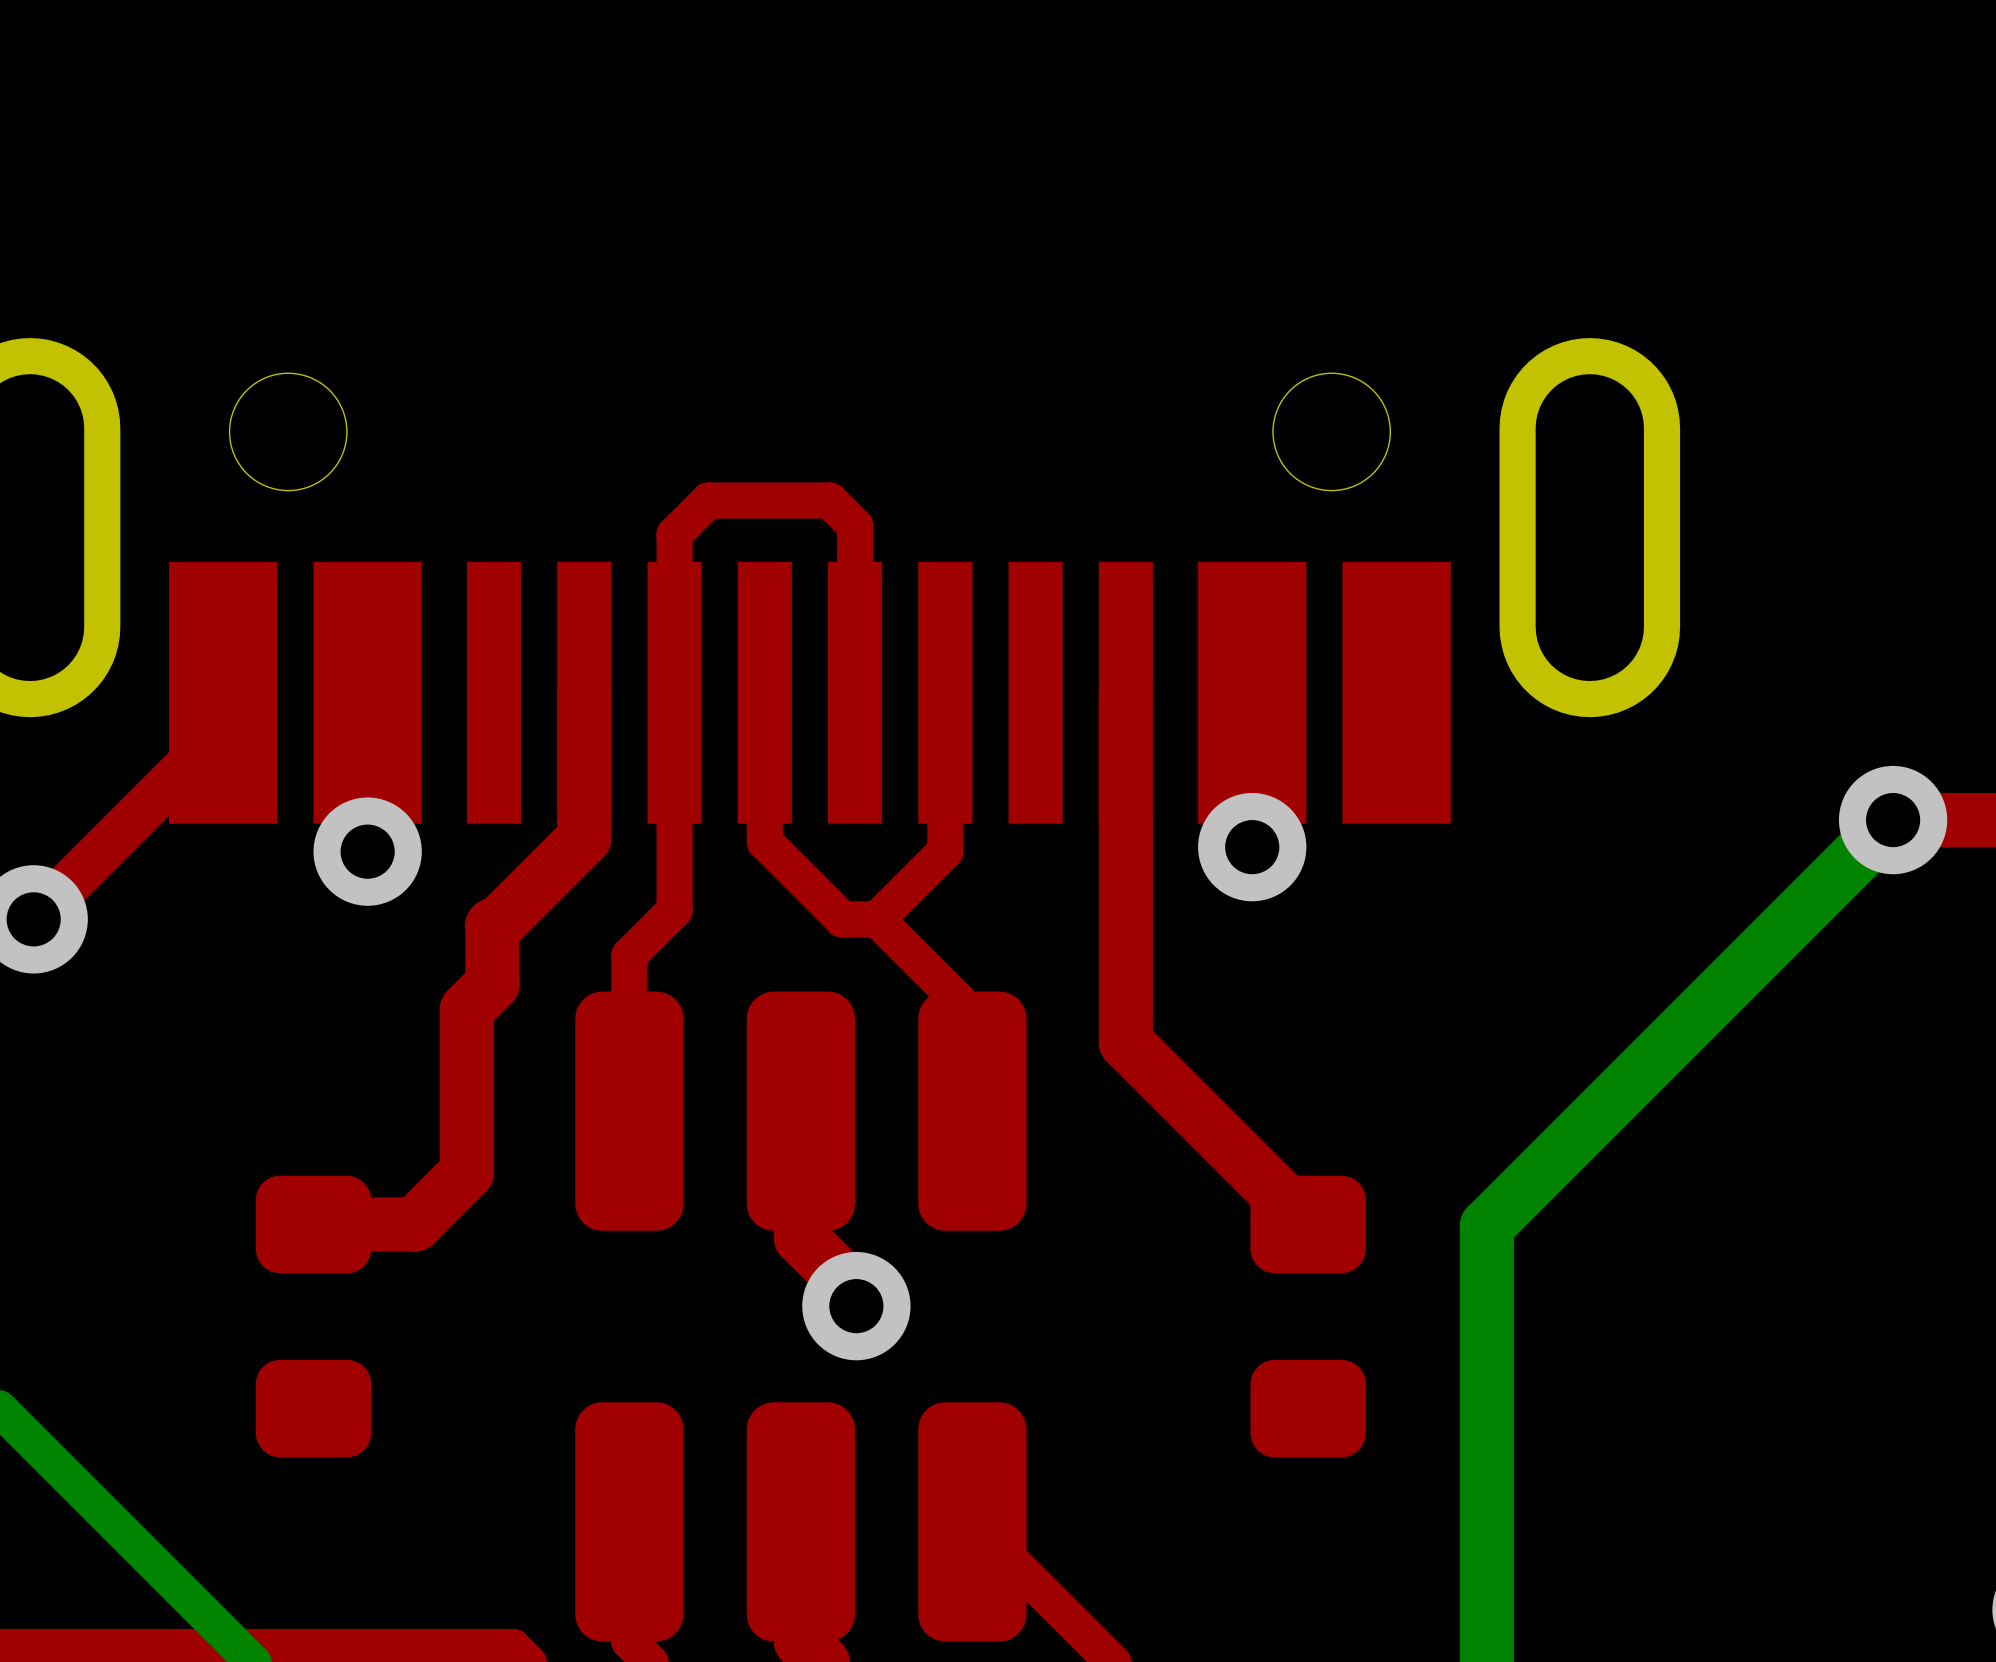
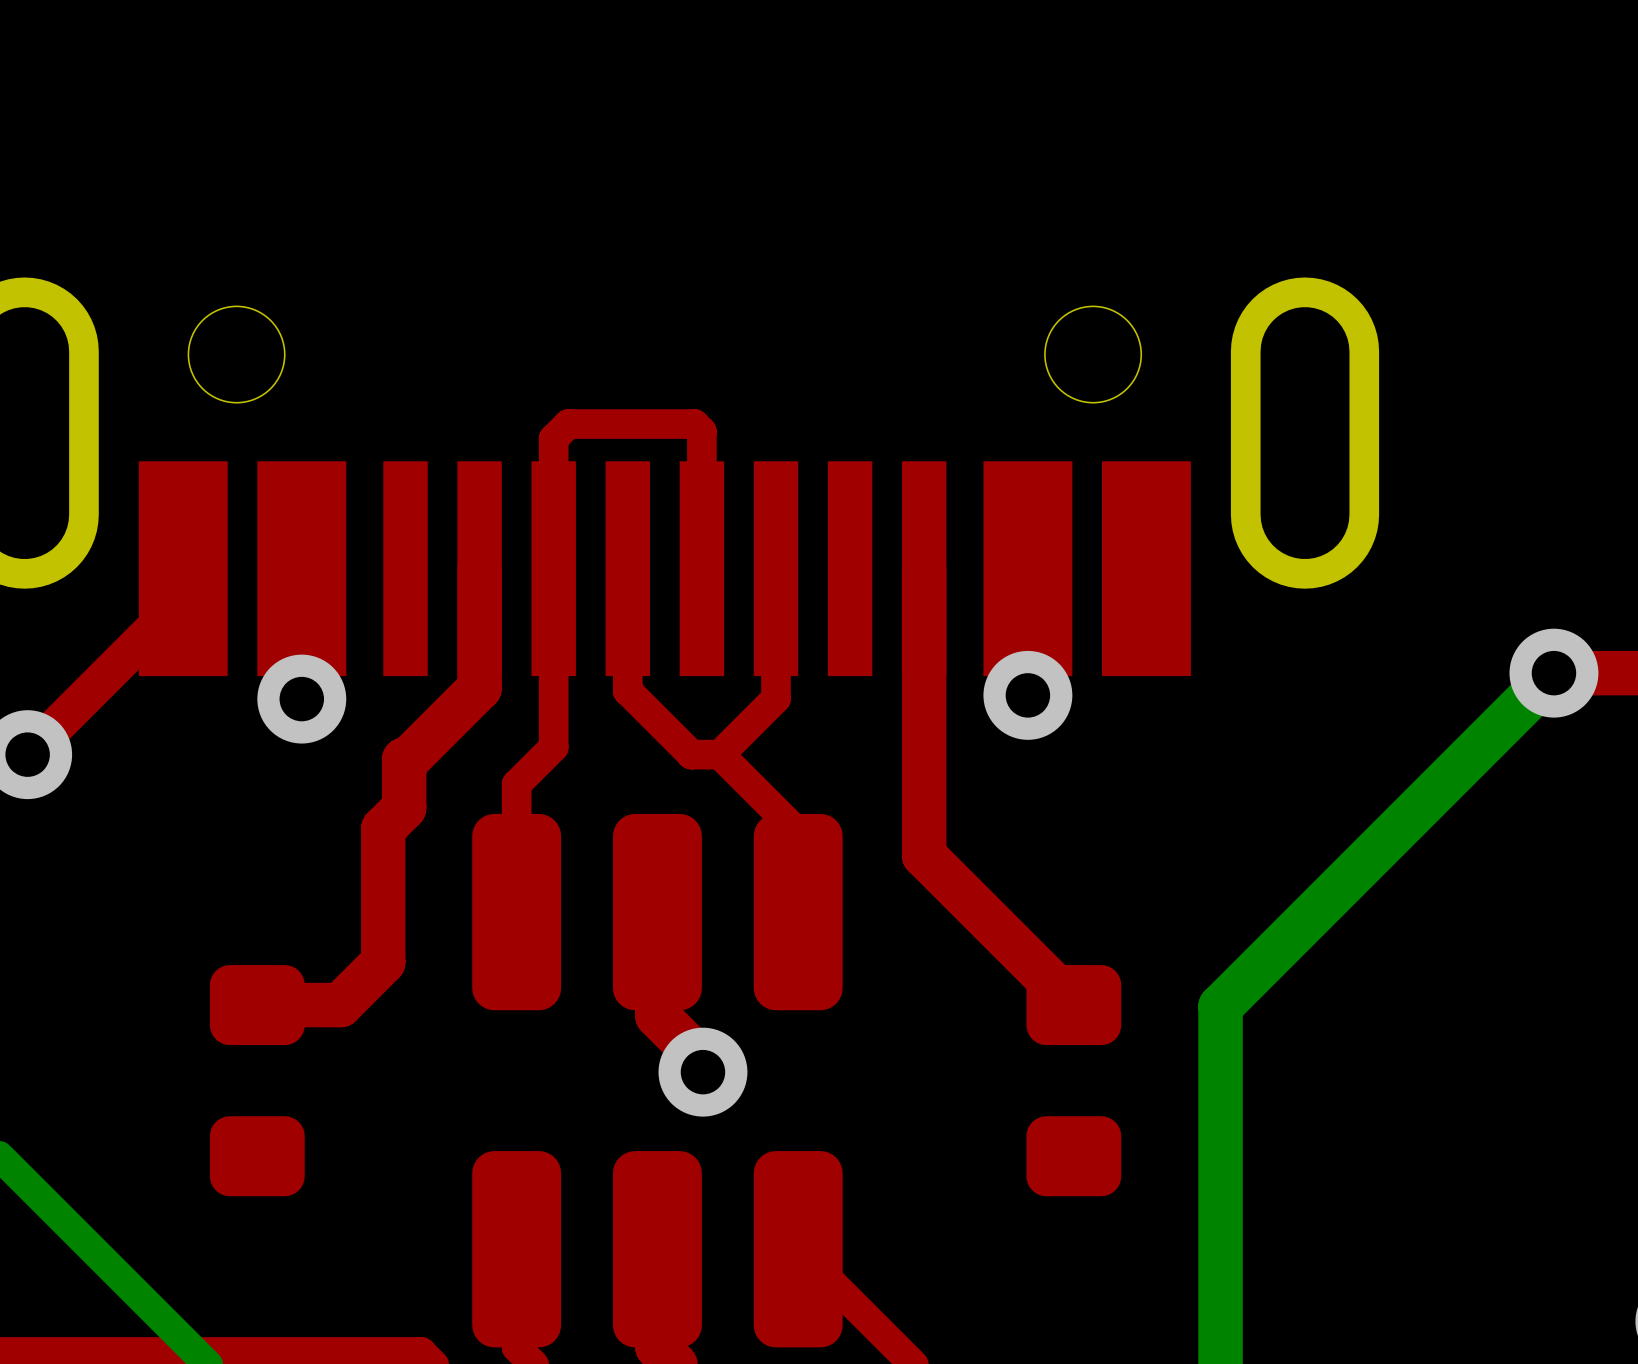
top track: (845, 516) (829, 500) (708, 500) (692, 516) -> (694, 424) (568, 424)

